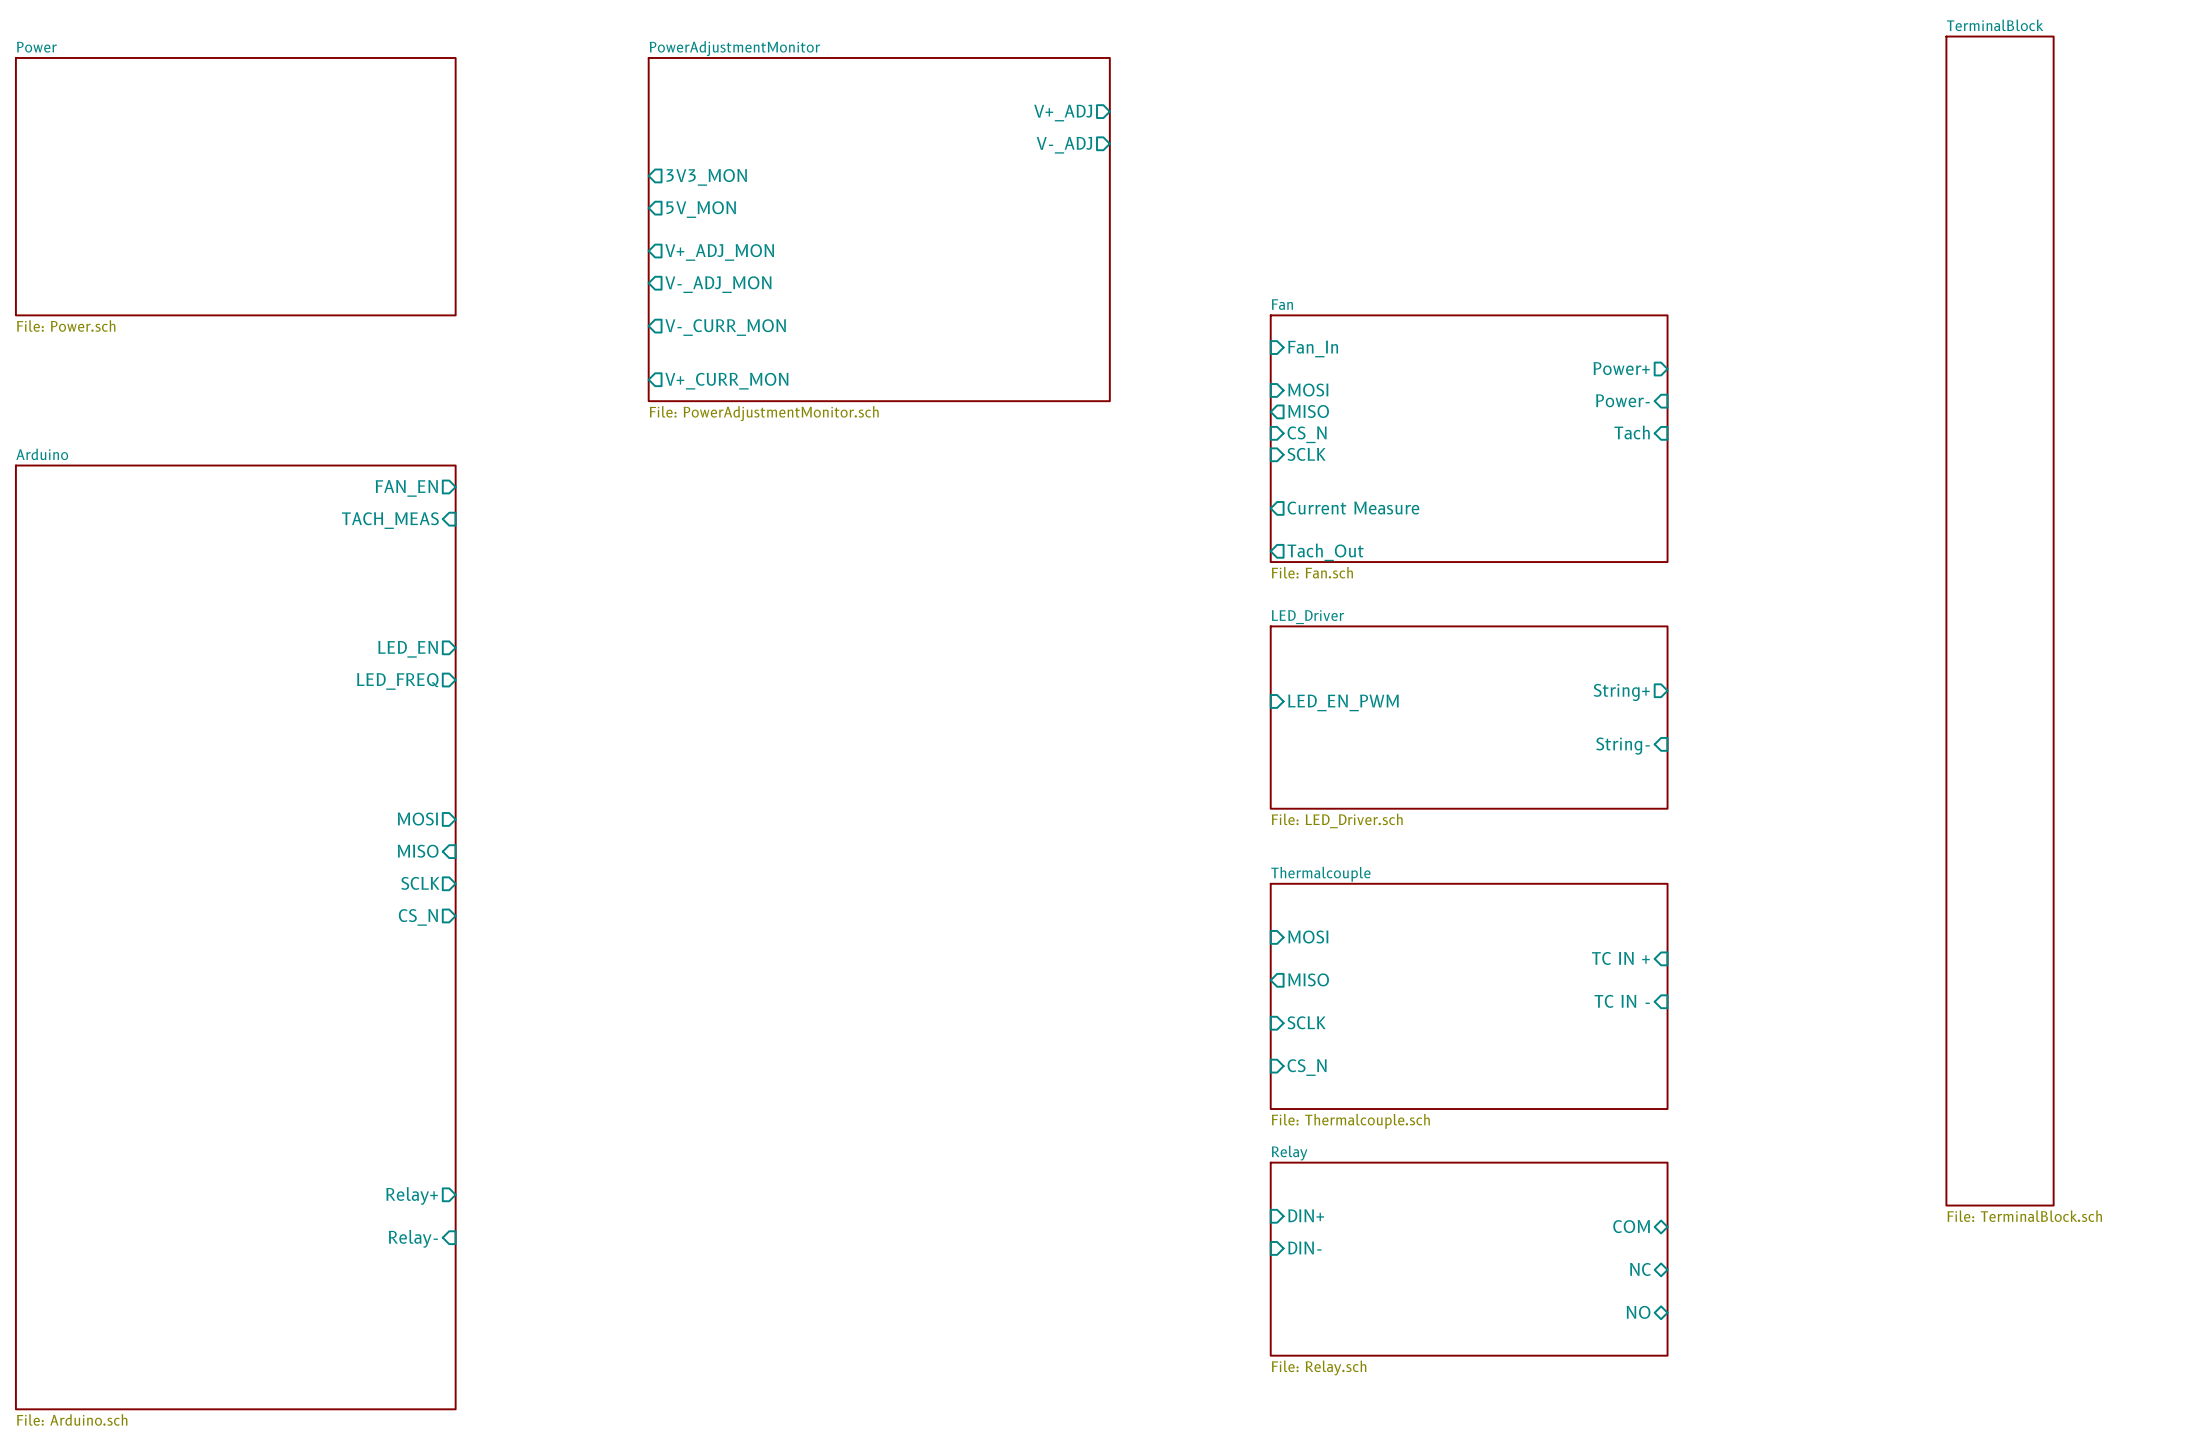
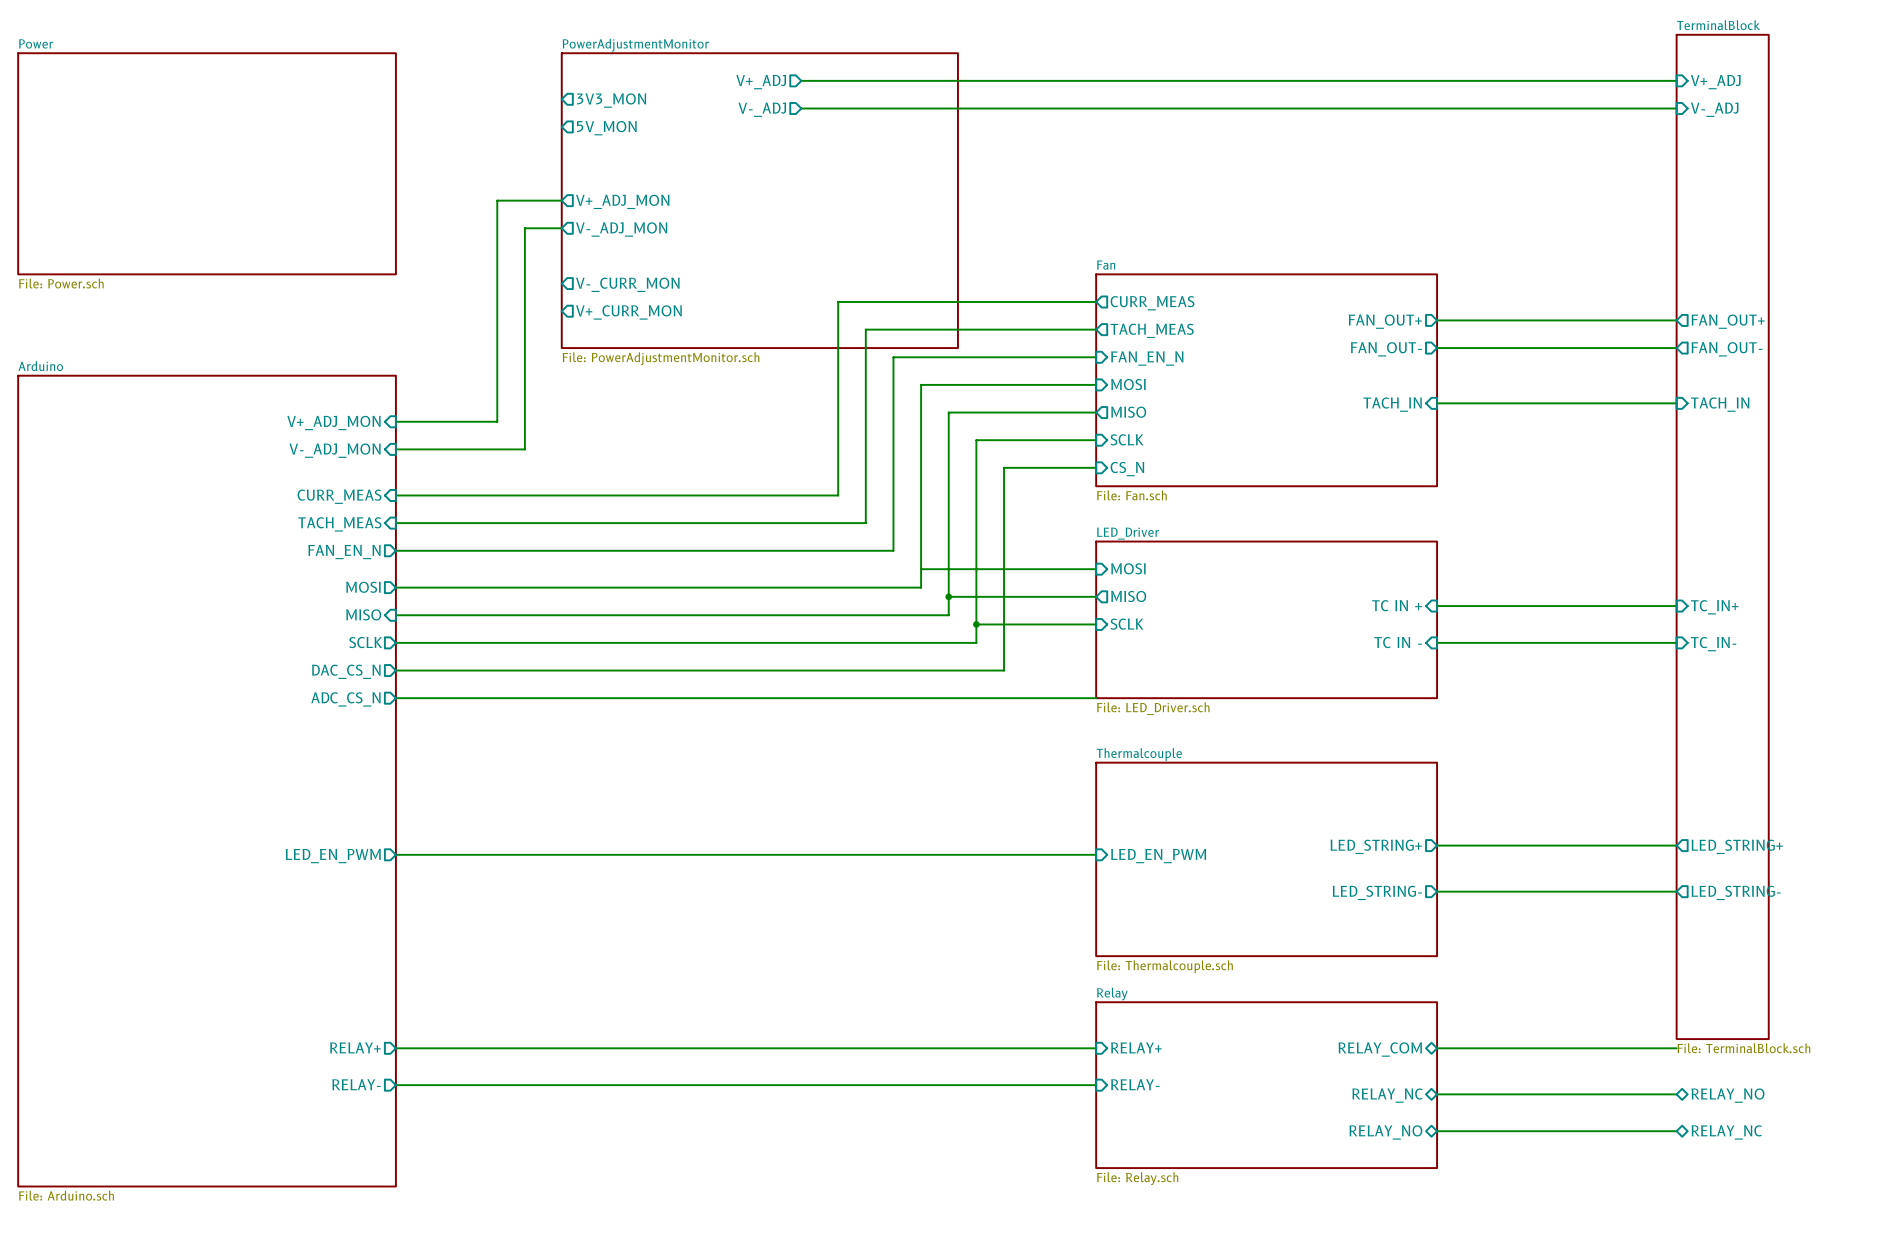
wire: none -> (801, 80) (1676, 80)
sheet pin: none -> V+_ADJ (1715, 82)
sheet pin position: V+_ADJ (1063, 113) -> V+_ADJ (761, 82)
wire: none -> (801, 108) (1676, 108)
sheet pin: none -> V-_ADJ (1714, 109)
sheet pin position: V-_ADJ (1064, 145) -> V-_ADJ (762, 109)
sheet pin position: 3V3_MON (706, 177) -> 3V3_MON (611, 100)
sheet pin position: 5V_MON (701, 209) -> 5V_MON (606, 128)
wire: none -> (561, 200) (497, 200) (497, 421) (395, 421)
sheet pin position: V+_ADJ_MON (719, 252) -> V+_ADJ_MON (622, 201)
wire: none -> (561, 228) (524, 228) (524, 449) (395, 449)
sheet pin position: V-_ADJ_MON (718, 284) -> V-_ADJ_MON (621, 229)
wire: none -> (1096, 301) (838, 301) (838, 495) (395, 495)
sheet pin shape: input (1313, 348) -> output (1152, 303)
sheet pin: Fan_In (1313, 348) -> CURR_MEAS (1152, 303)
sheet pin: Power+ (1621, 368) -> FAN_OUT+ (1385, 321)
wire: none -> (1437, 320) (1676, 320)
sheet pin: none -> FAN_OUT+ (1728, 321)
wire: none -> (1096, 329) (865, 329) (865, 523) (395, 523)
sheet pin position: V+_CURR_MON (726, 381) -> V+_CURR_MON (628, 312)
sheet pin: none -> TACH_MEAS (1152, 330)
sheet pin position: MOSI (1308, 390) -> MOSI (1128, 384)
sheet pin shape: input (1622, 400) -> output (1386, 349)
sheet pin: Power- (1622, 400) -> FAN_OUT- (1386, 349)
wire: none -> (1437, 348) (1676, 348)
sheet pin: none -> FAN_OUT- (1727, 349)
wire: none -> (1096, 357) (893, 357) (893, 550) (395, 550)
sheet pin shape: output (1308, 411) -> input (1147, 358)
sheet pin: MISO (1308, 411) -> FAN_EN_N (1147, 358)
sheet pin: Tach (1632, 432) -> none
sheet pin position: CS_N (1307, 434) -> CS_N (1127, 469)
wire: none -> (1096, 384) (921, 384) (921, 587) (395, 587)
sheet pin: SCLK (1306, 454) -> none
wire: none -> (1437, 403) (1676, 403)
sheet pin: none -> TACH_IN (1392, 404)
sheet pin: none -> TACH_IN (1720, 404)
sheet pin: none -> MISO (1128, 412)
wire: none -> (1096, 412) (948, 412) (948, 615) (395, 615)
sheet pin shape: output (406, 488) -> input (333, 423)
sheet pin: FAN_EN (406, 488) -> V+_ADJ_MON (333, 423)
wire: none -> (1096, 440) (976, 440) (976, 642) (395, 642)
sheet pin shape: output (1353, 508) -> input (1126, 439)
sheet pin: Current Measure (1353, 508) -> SCLK (1126, 439)
sheet pin: TACH_MEAS (390, 520) -> V-_ADJ_MON (335, 450)
wire: none -> (1096, 467) (1004, 467) (1004, 670) (395, 670)
sheet pin: Tach_Out (1325, 552) -> none
sheet pin: none -> CURR_MEAS (339, 496)
sheet pin: none -> TACH_MEAS (339, 524)
sheet pin: none -> FAN_EN_N (344, 552)
sheet pin: LED_EN (408, 649) -> none
wire: none -> (921, 569) (1096, 569)
sheet pin: none -> MOSI (1128, 568)
sheet pin: LED_FREQ (397, 681) -> MOSI (363, 587)
wire: none -> (948, 596) (1096, 596)
junction: none -> (948, 596)
sheet pin: none -> MISO (1128, 596)
sheet pin: String+ (1621, 692) -> none
sheet pin: none -> TC IN + (1396, 605)
wire: none -> (1437, 606) (1676, 606)
sheet pin: LED_EN_PWM (1343, 702) -> none
sheet pin: none -> TC_IN+ (1714, 607)
wire: none -> (976, 624) (1096, 624)
junction: none -> (976, 624)
sheet pin: none -> SCLK (1126, 624)
wire: none -> (1437, 642) (1676, 642)
sheet pin: none -> TC_IN- (1713, 644)
sheet pin: String- (1623, 746) -> TC IN - (1398, 642)
sheet pin: none -> DAC_CS_N (346, 671)
wire: none -> (395, 698) (1096, 698)
sheet pin: none -> ADC_CS_N (345, 699)
sheet pin: MOSI (417, 819) -> none
sheet pin position: MISO (418, 851) -> MISO (363, 614)
sheet pin position: SCLK (420, 883) -> SCLK (365, 642)
sheet pin: CS_N (418, 917) -> none
sheet Arduino position: (235, 937) -> (207, 781)
sheet pin: MOSI (1308, 937) -> none
sheet pin: TC IN + (1620, 958) -> none
sheet pin: MISO (1308, 979) -> none
wire: none -> (1437, 845) (1676, 845)
sheet pin: none -> LED_STRING+ (1376, 846)
sheet pin: none -> LED_STRING+ (1737, 846)
wire: none -> (395, 854) (1096, 854)
sheet pin: none -> LED_EN_PWM (333, 856)
sheet pin: none -> LED_EN_PWM (1158, 856)
sheet pin: TC IN - (1622, 1001) -> none
sheet pin: SCLK (1306, 1022) -> none
wire: none -> (1437, 891) (1676, 891)
sheet pin: none -> LED_STRING- (1377, 892)
sheet pin: none -> LED_STRING- (1736, 892)
sheet pin: CS_N (1307, 1067) -> none
sheet pin: Relay+ (412, 1195) -> none
sheet pin: none -> RELAY+ (355, 1047)
sheet pin: DIN+ (1306, 1215) -> RELAY+ (1136, 1047)
wire: none -> (395, 1048) (1096, 1048)
wire: none -> (1437, 1048) (1676, 1048)
sheet pin: none -> RELAY_COM (1380, 1049)
sheet pin: COM (1631, 1226) -> none
sheet pin: Relay- (413, 1238) -> none
sheet pin: DIN- (1304, 1247) -> none
sheet pin: none -> RELAY- (356, 1084)
sheet pin: none -> RELAY- (1135, 1084)
wire: none -> (395, 1085) (1096, 1085)
sheet pin: NC (1640, 1269) -> RELAY_NC (1387, 1095)
wire: none -> (1437, 1094) (1676, 1094)
sheet pin: none -> RELAY_NO (1728, 1095)
sheet pin: NO (1638, 1312) -> RELAY_NO (1385, 1132)
wire: none -> (1437, 1131) (1676, 1131)
sheet pin: none -> RELAY_NC (1726, 1132)

